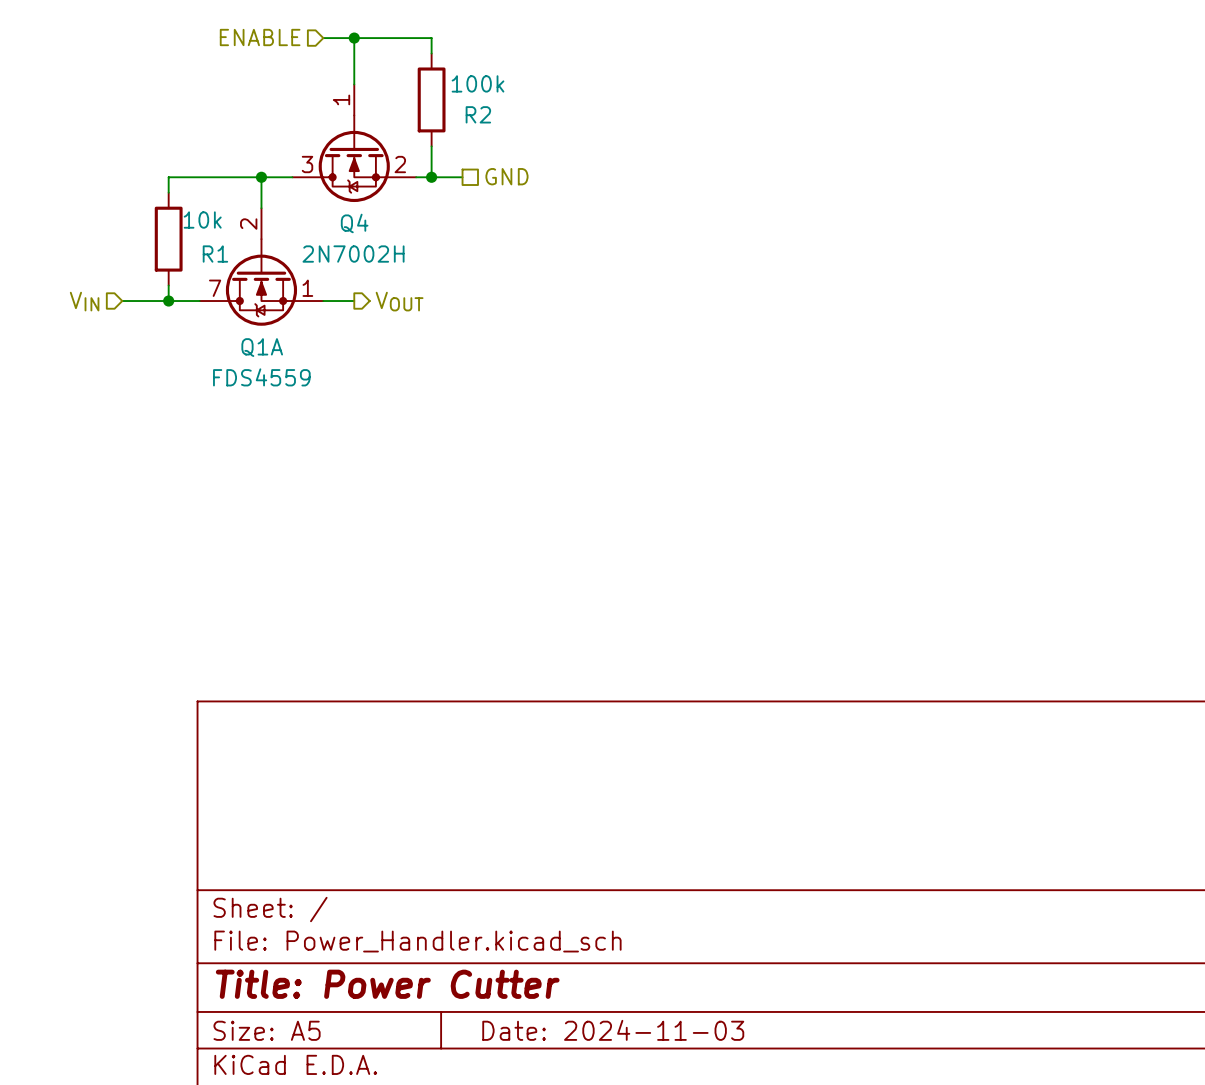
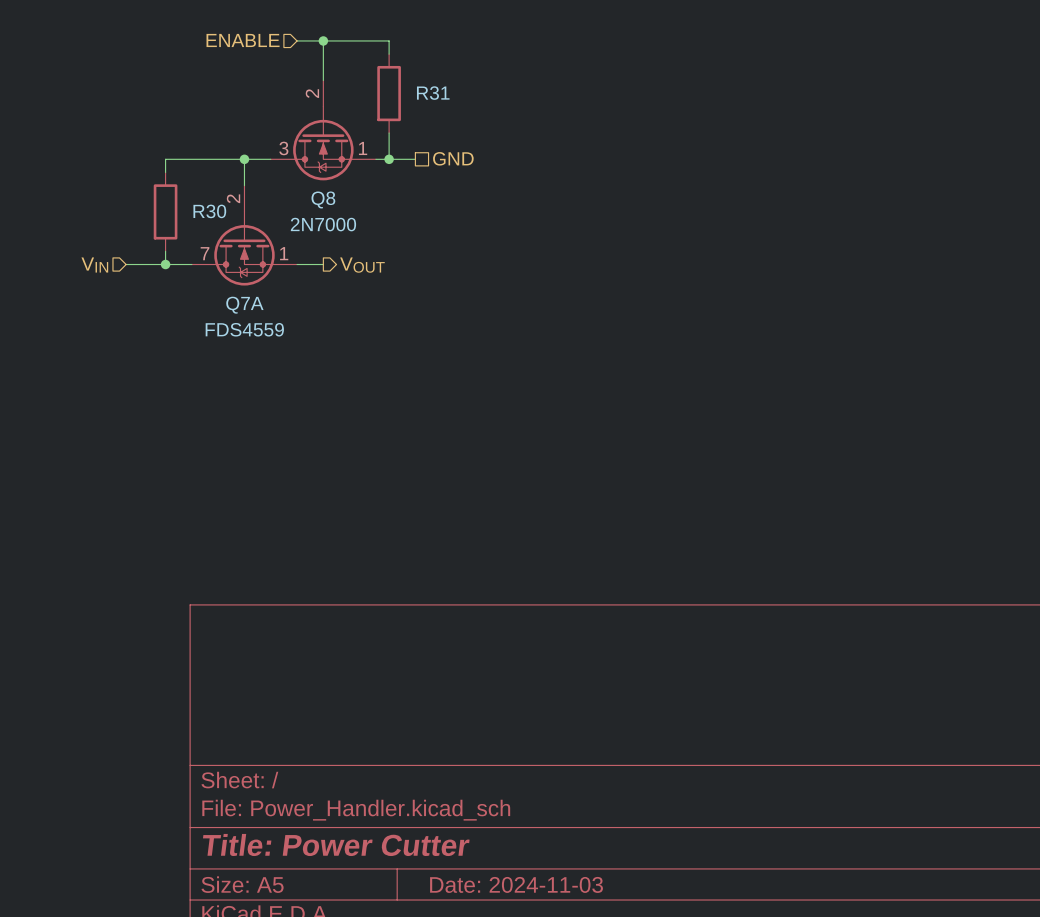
R2 value: 100k (478, 83) -> none
Q4 pin number: 1 (341, 99) -> 2 (312, 93)
R2 name: R2 (478, 114) -> R31 (433, 93)
Q4 pin number: 2 (400, 164) -> 1 (363, 148)
R1 value: 10k (202, 220) -> none
Q4 name: Q4 (354, 223) -> Q8 (323, 199)
R1 name: R1 (215, 254) -> R30 (209, 211)
Q4 value: 2N7002H (353, 254) -> 2N7000 (323, 224)
Q1A name: Q1A (262, 347) -> Q7A (244, 305)

